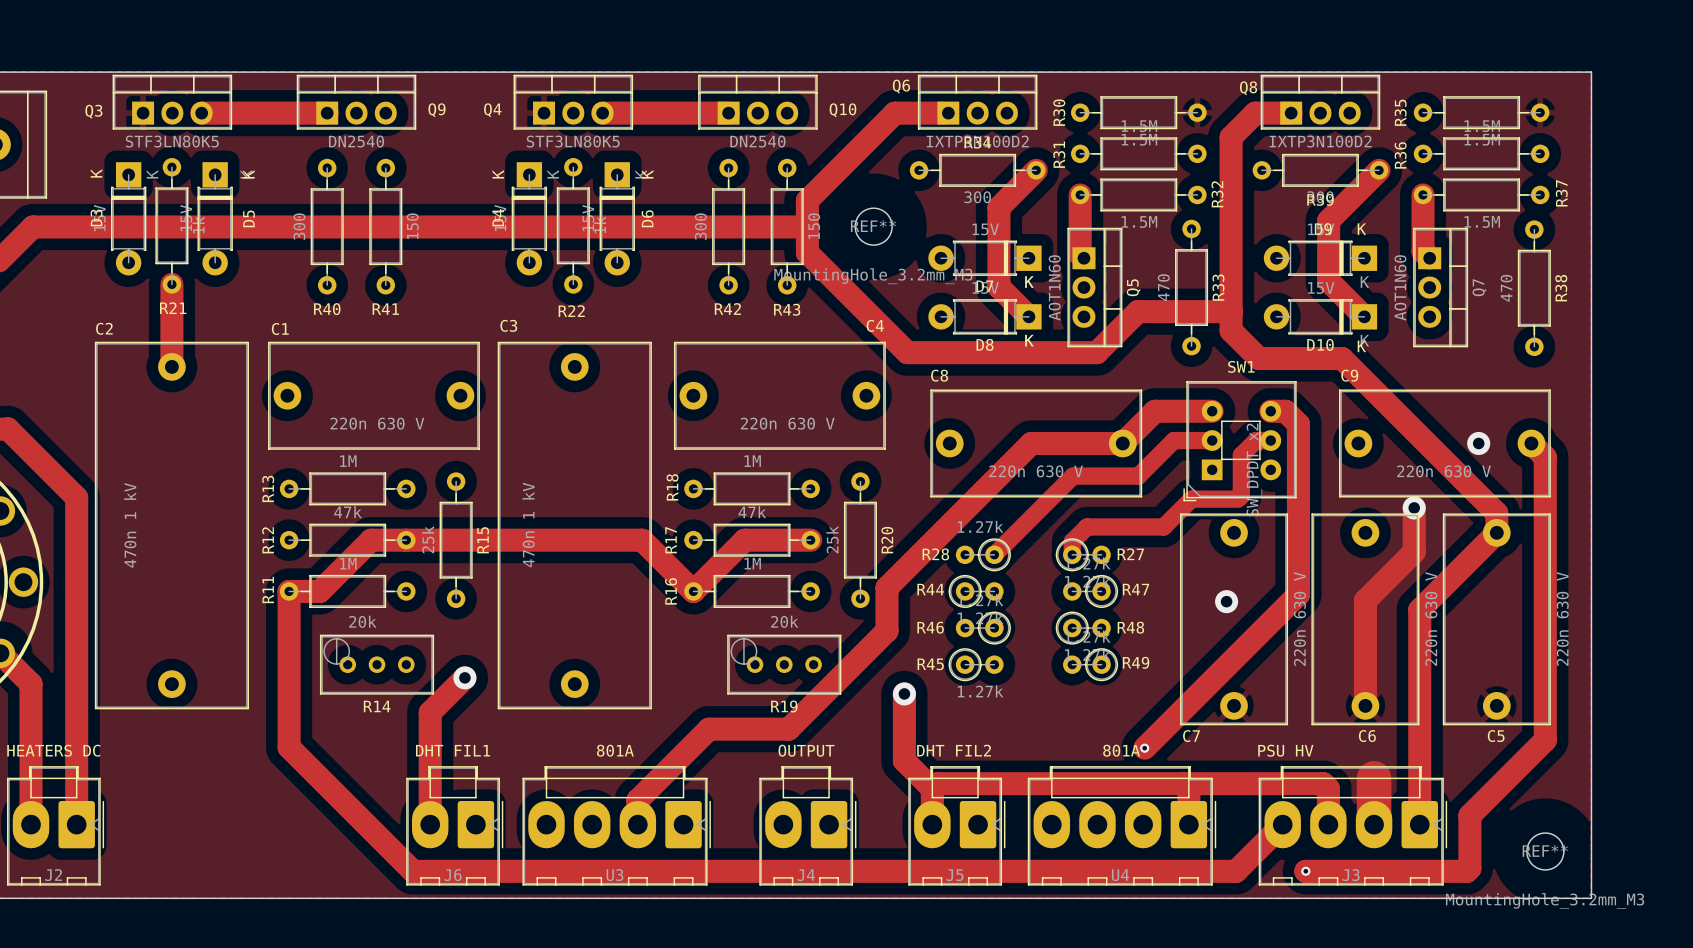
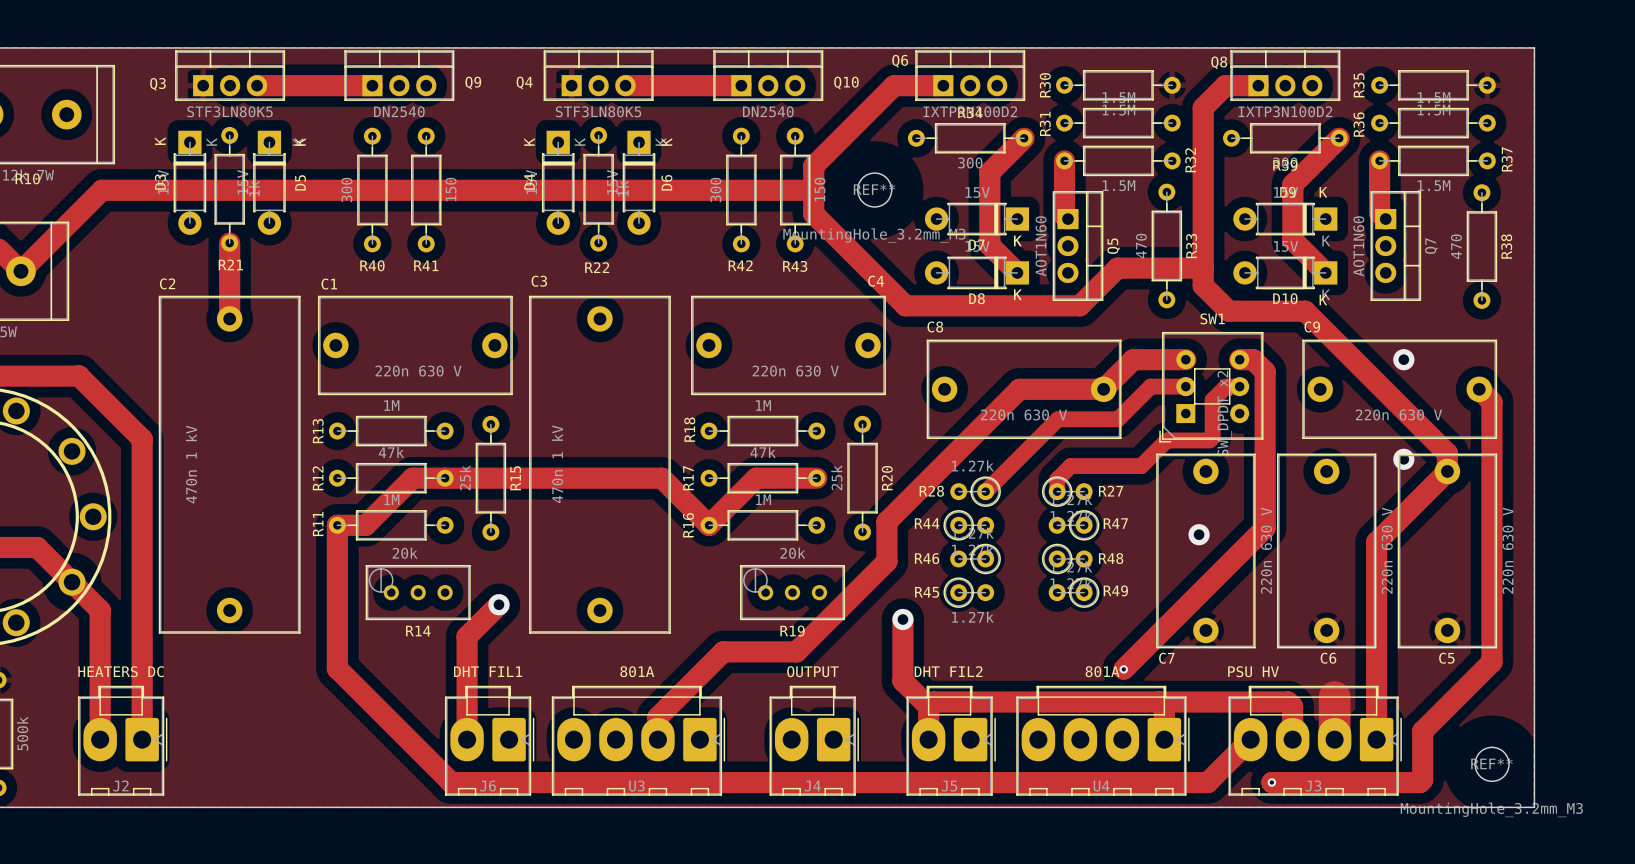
via: none -> (1403, 359)
via: (1478, 443) -> none
track: (1414, 507) (1414, 551) (1365, 600) (1365, 705) -> none
via position: (1414, 507) -> (1403, 459)

